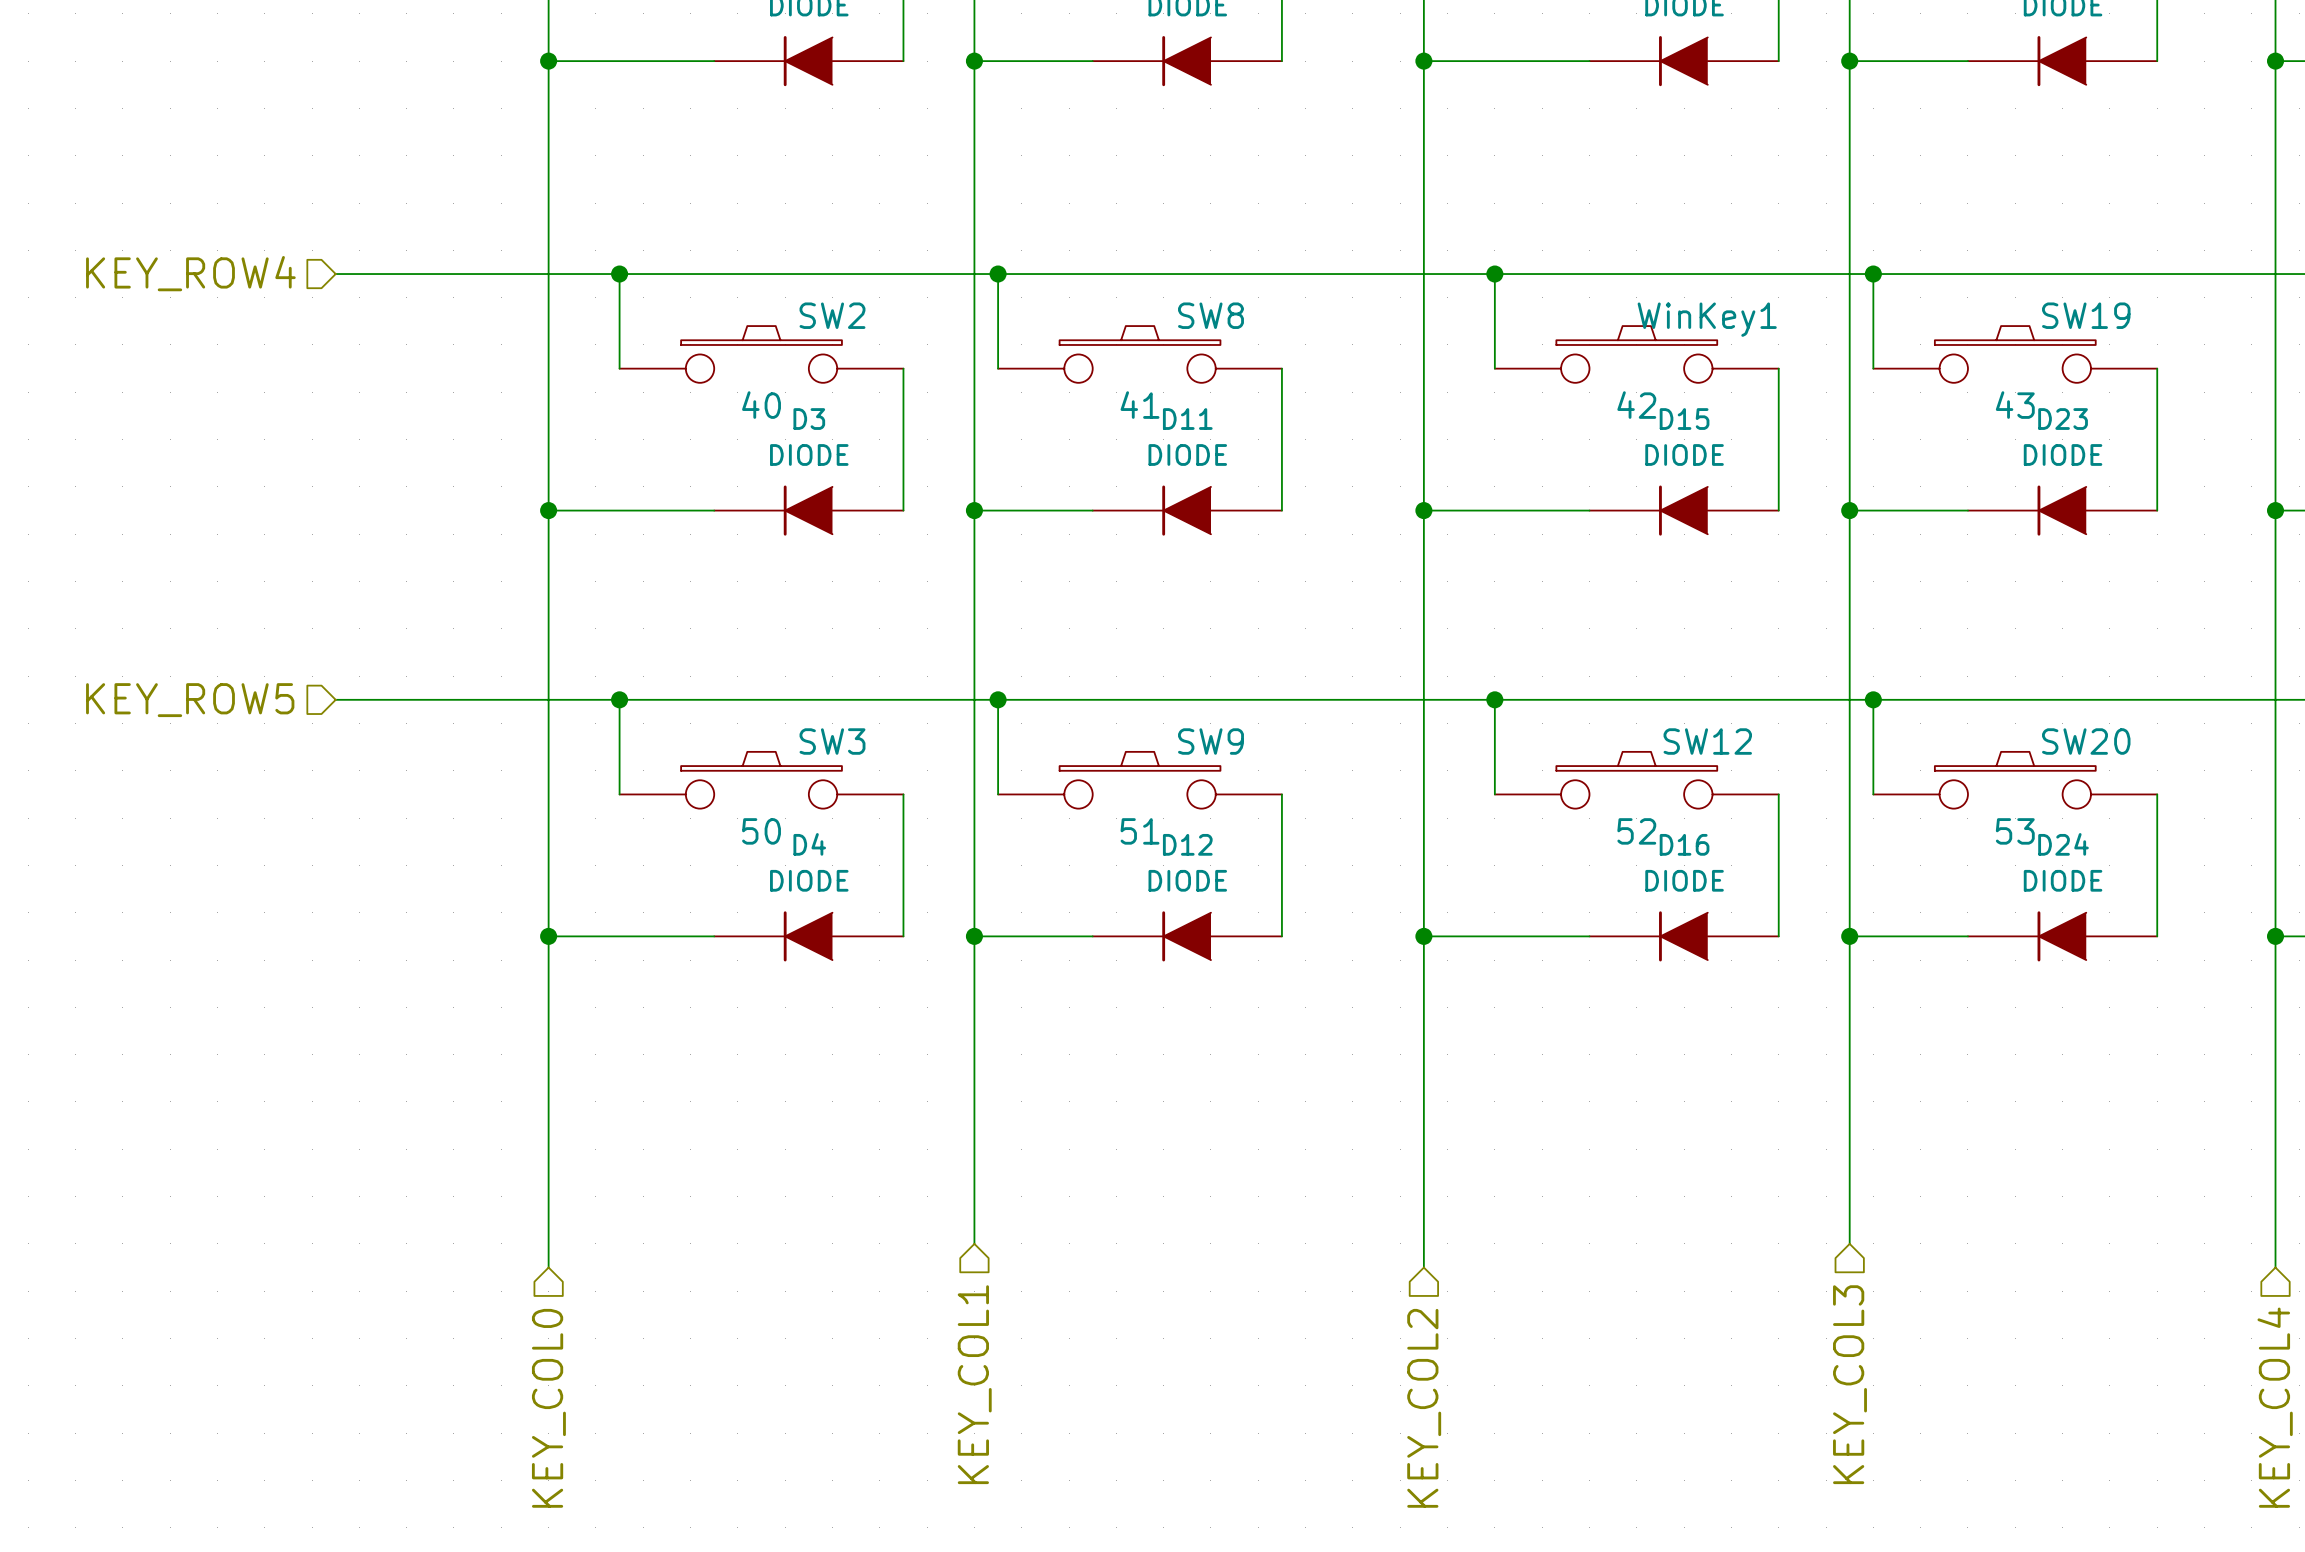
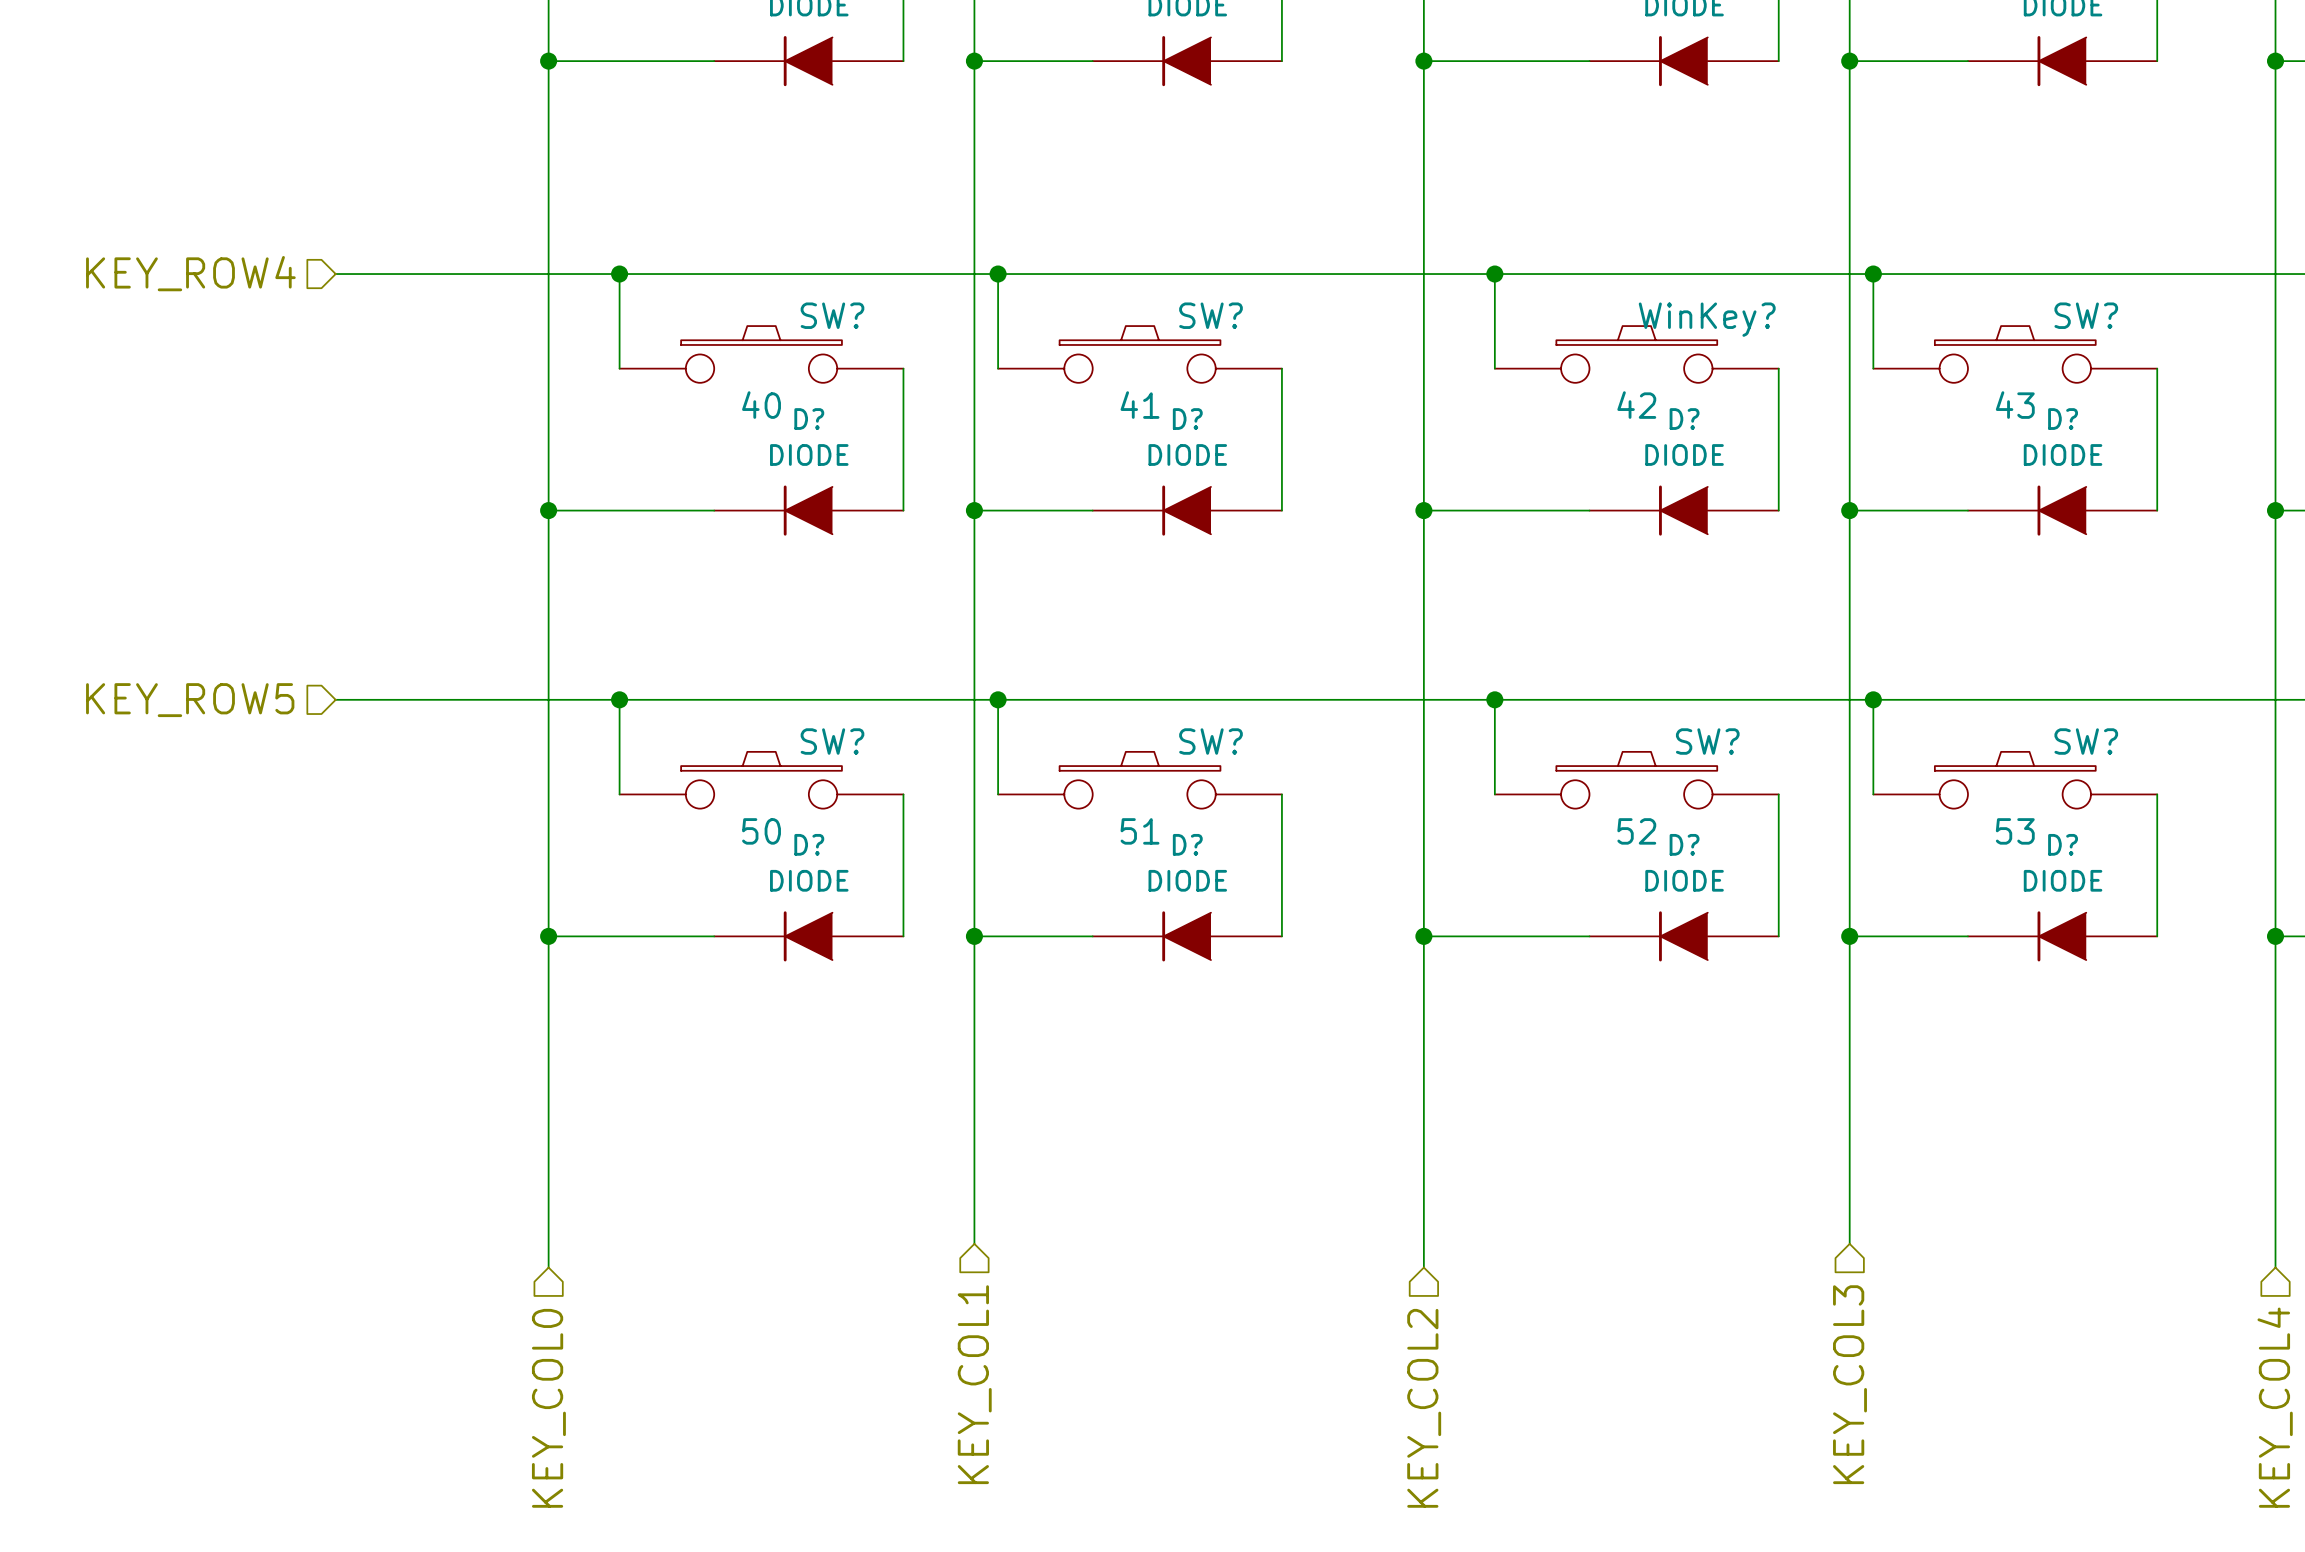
SW2 name: SW2 (832, 315) -> SW? (832, 315)
SW8 name: SW8 (1210, 315) -> SW? (1210, 315)
SW19 name: SW19 (2086, 315) -> SW? (2086, 315)
WinKey1 name: WinKey1 (1707, 319) -> WinKey? (1707, 319)
D3 name: D3 (809, 419) -> D? (809, 419)
D11 name: D11 (1187, 419) -> D? (1187, 419)
D15 name: D15 (1684, 419) -> D? (1684, 419)
D23 name: D23 (2063, 419) -> D? (2063, 419)
SW3 name: SW3 (832, 741) -> SW? (832, 741)
SW9 name: SW9 (1210, 741) -> SW? (1210, 741)
SW12 name: SW12 (1707, 741) -> SW? (1707, 741)
SW20 name: SW20 (2086, 741) -> SW? (2086, 741)
D4 name: D4 (809, 844) -> D? (809, 844)
D12 name: D12 (1187, 844) -> D? (1187, 844)
D16 name: D16 (1684, 844) -> D? (1684, 844)
D24 name: D24 (2063, 844) -> D? (2063, 844)

